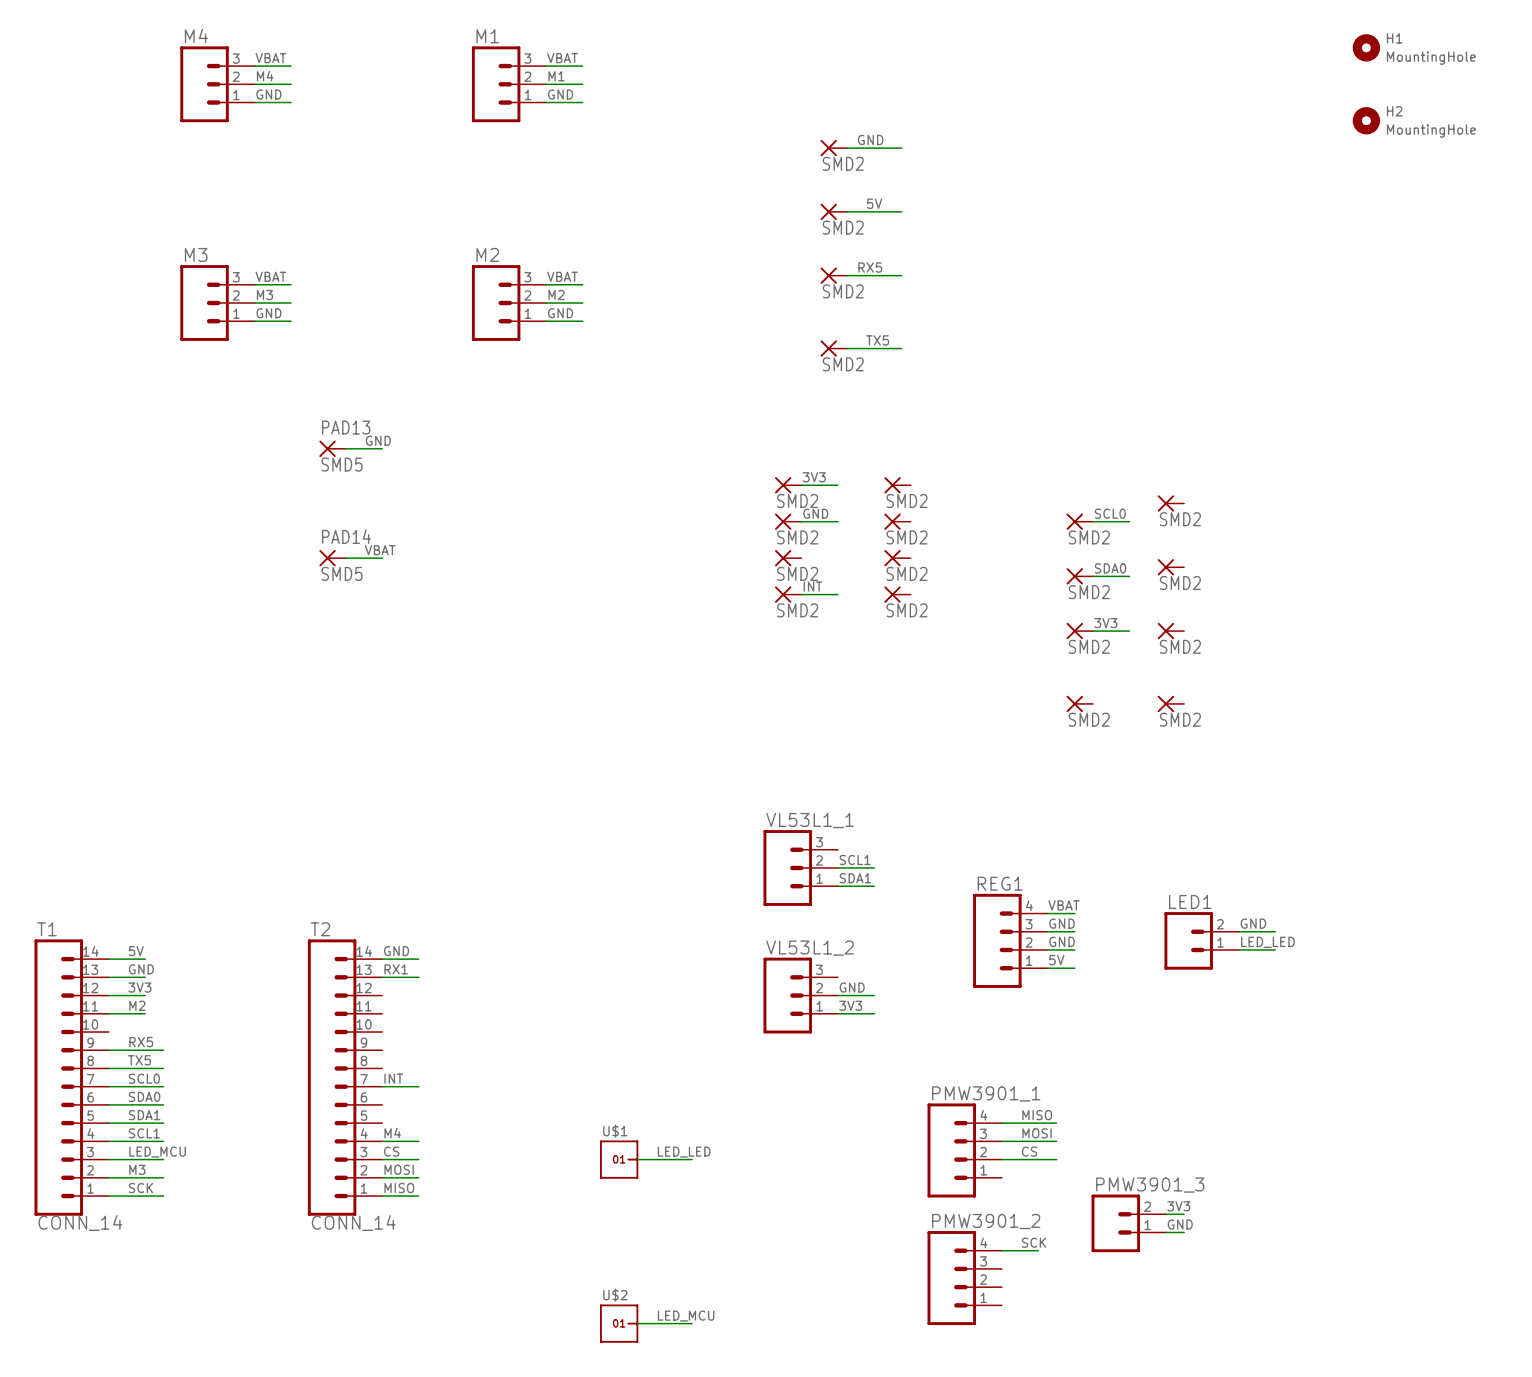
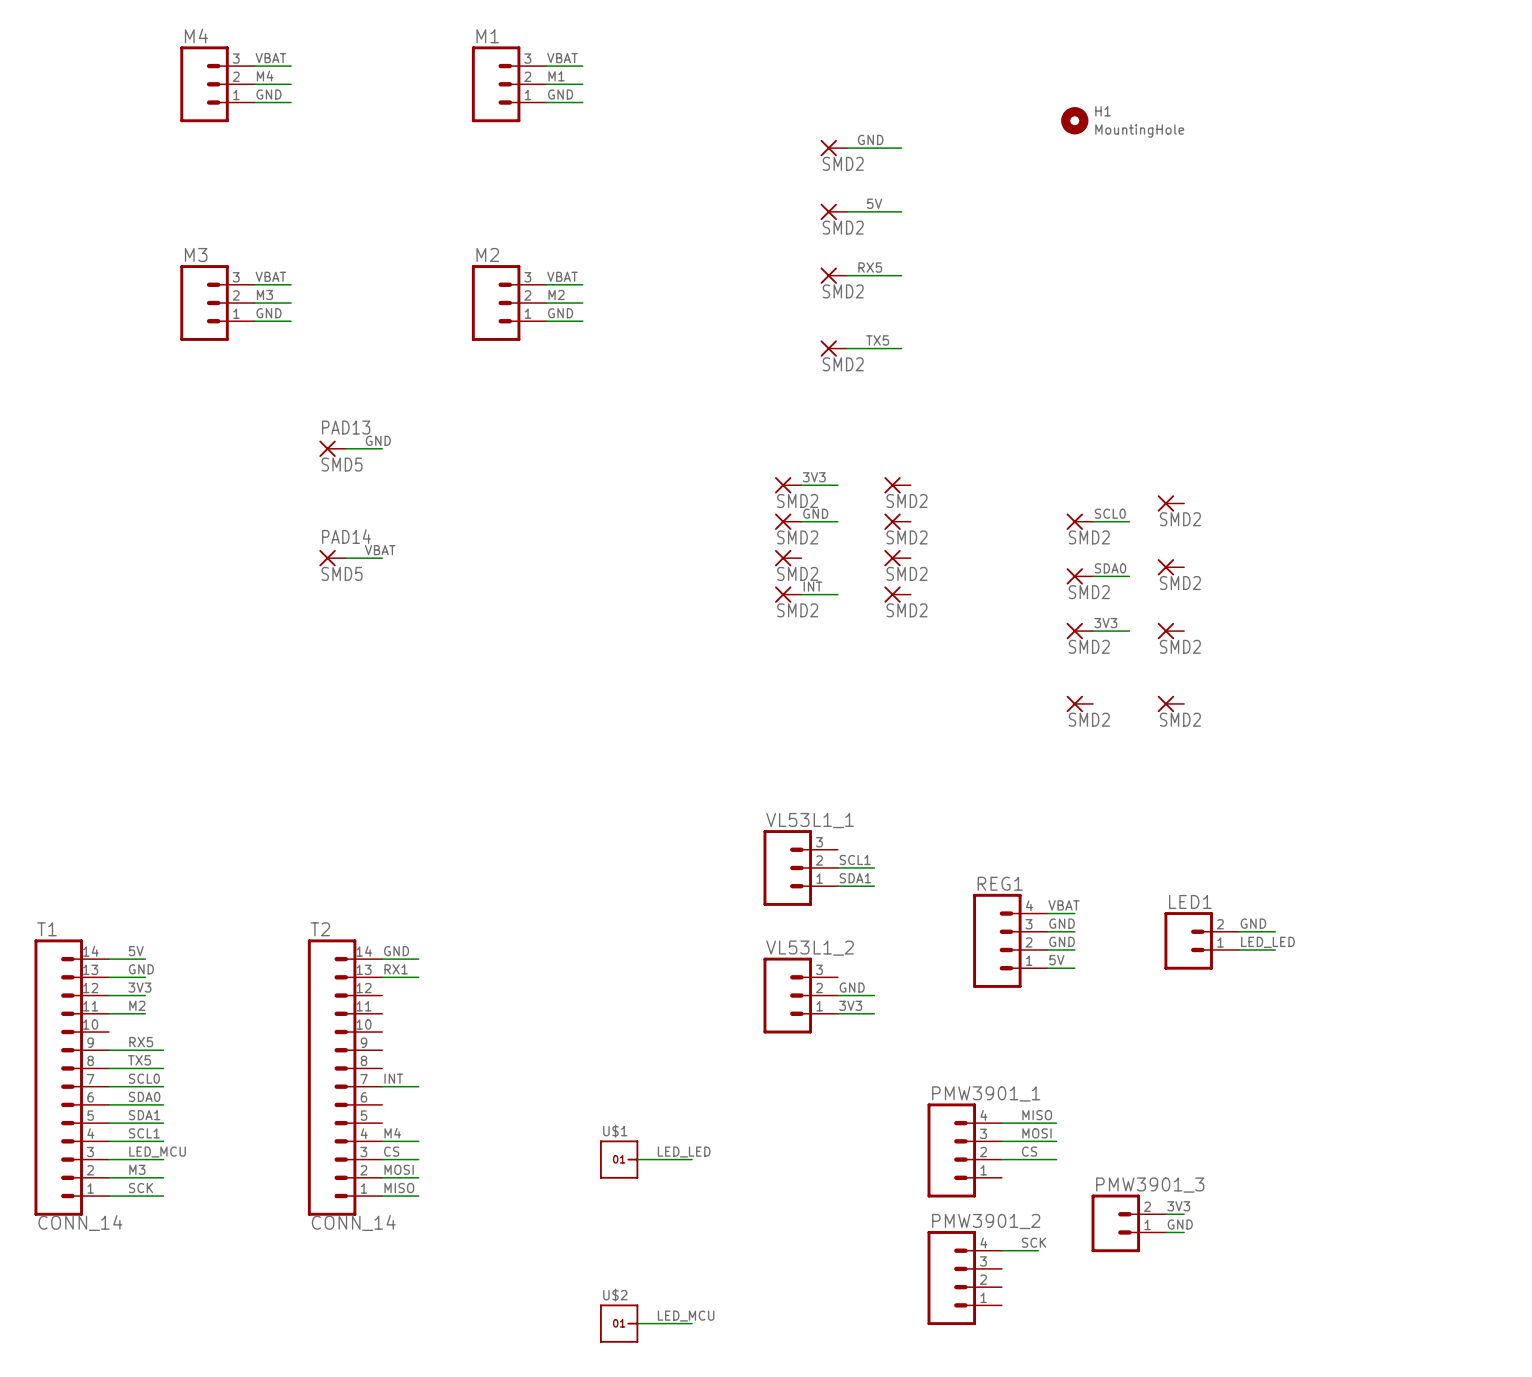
H1 position: (1366, 47) -> (1074, 120)
H2: MountingHole (1366, 120) -> none

